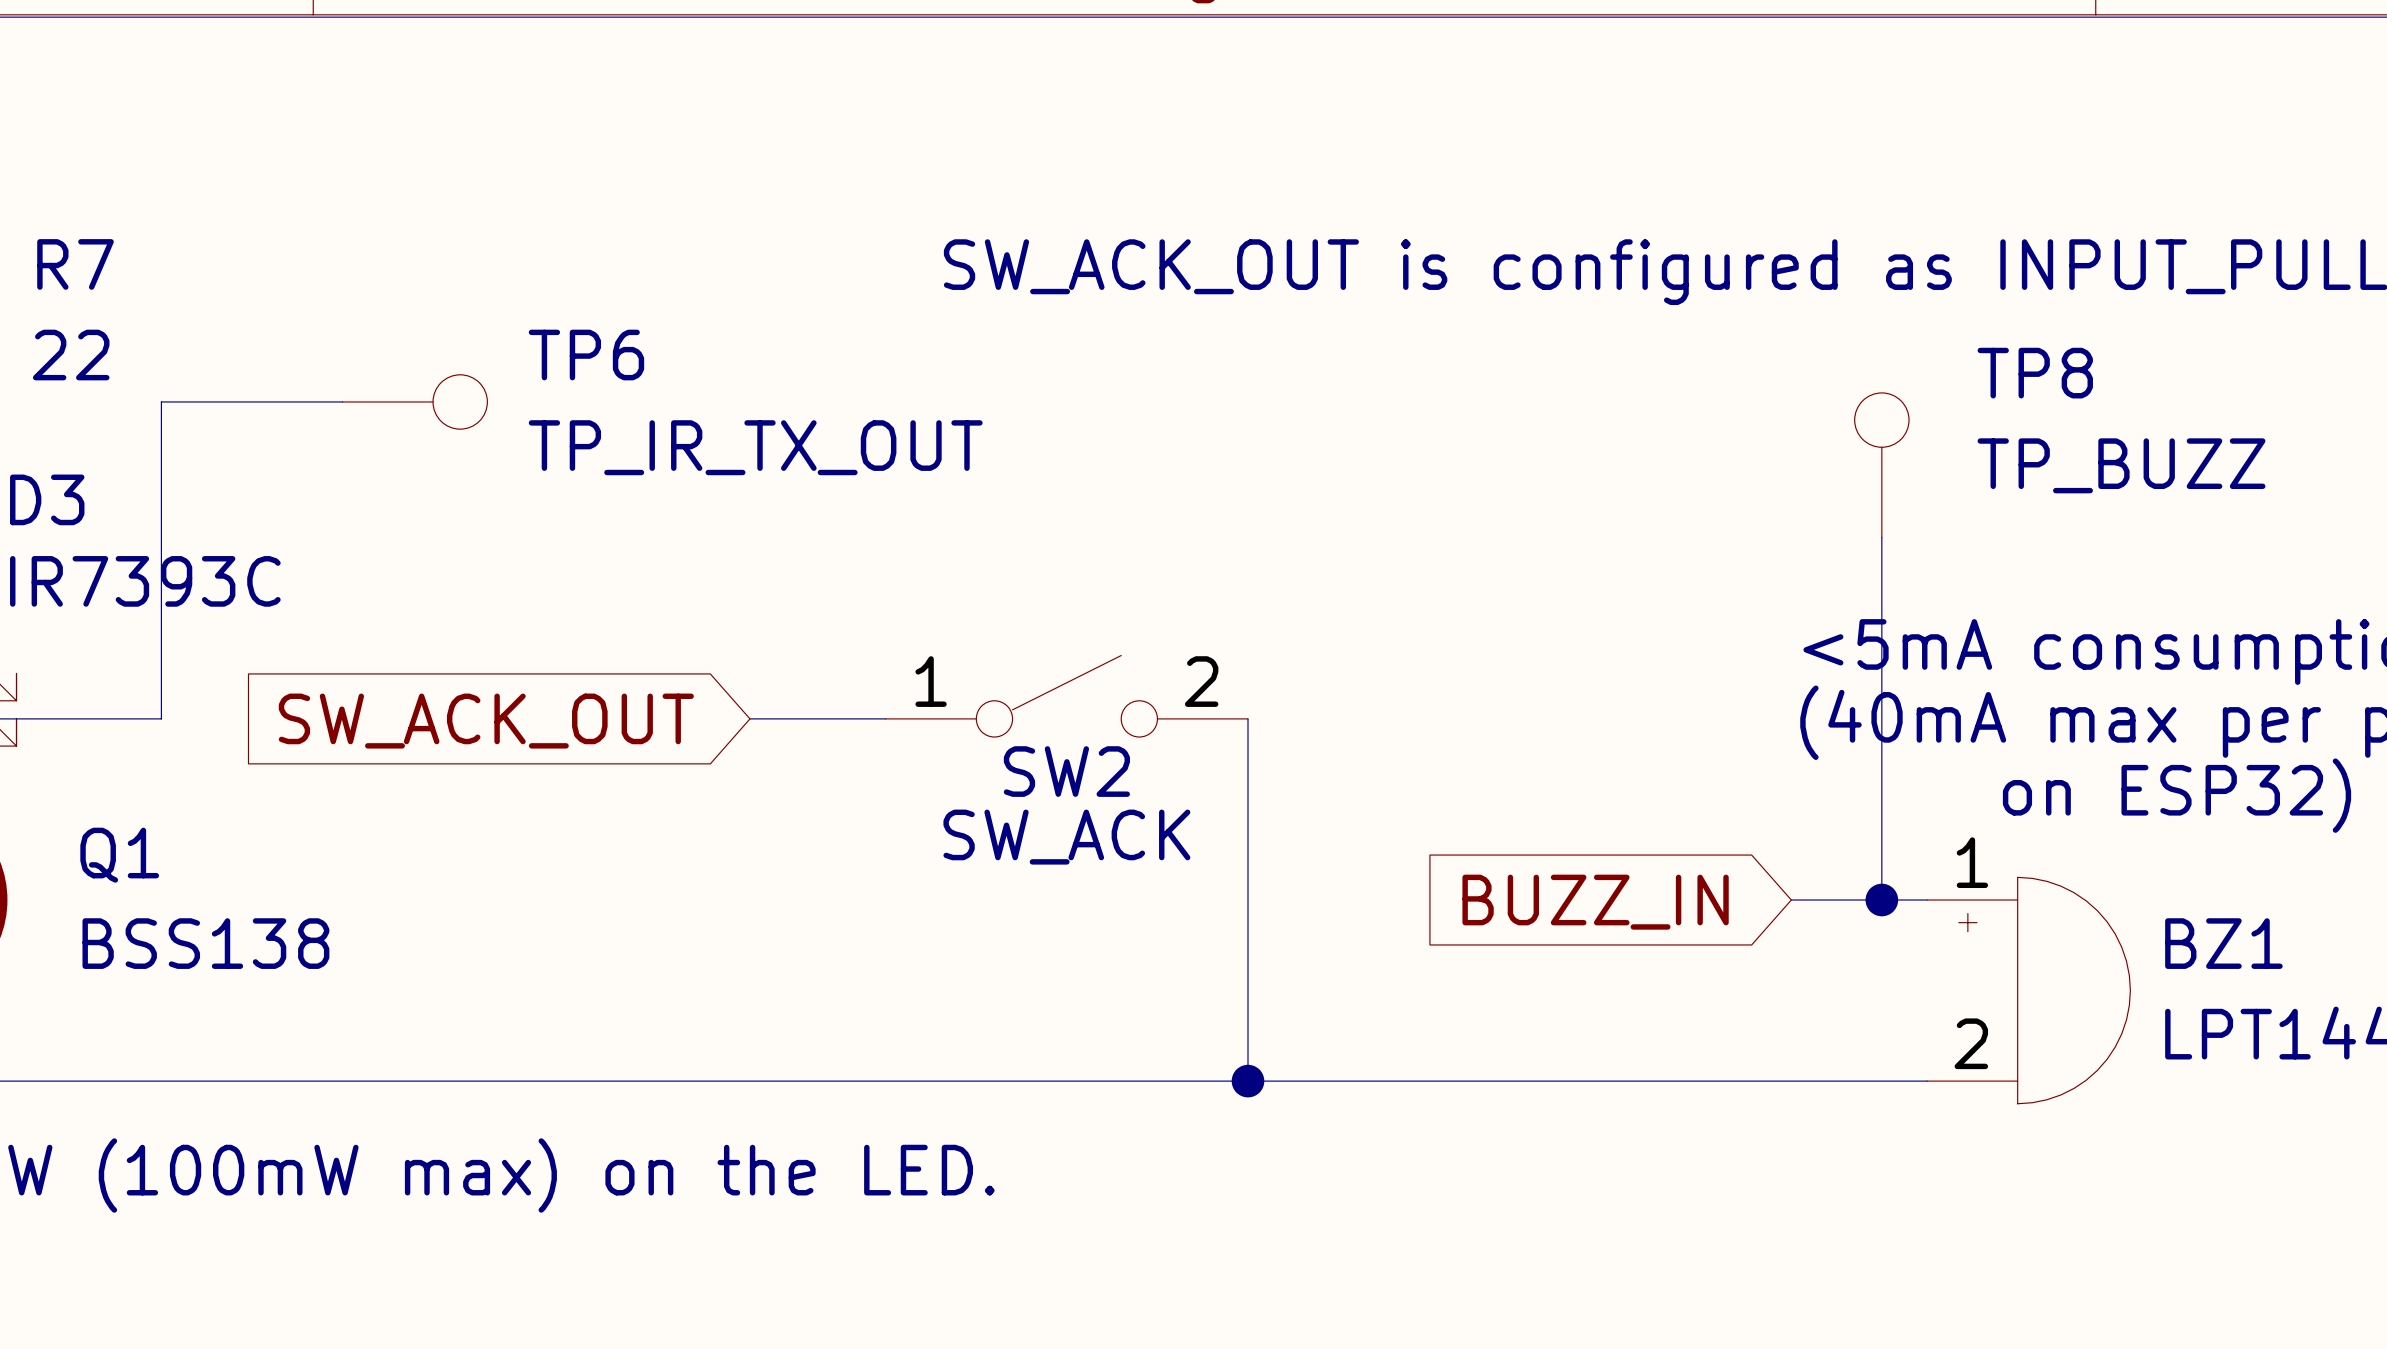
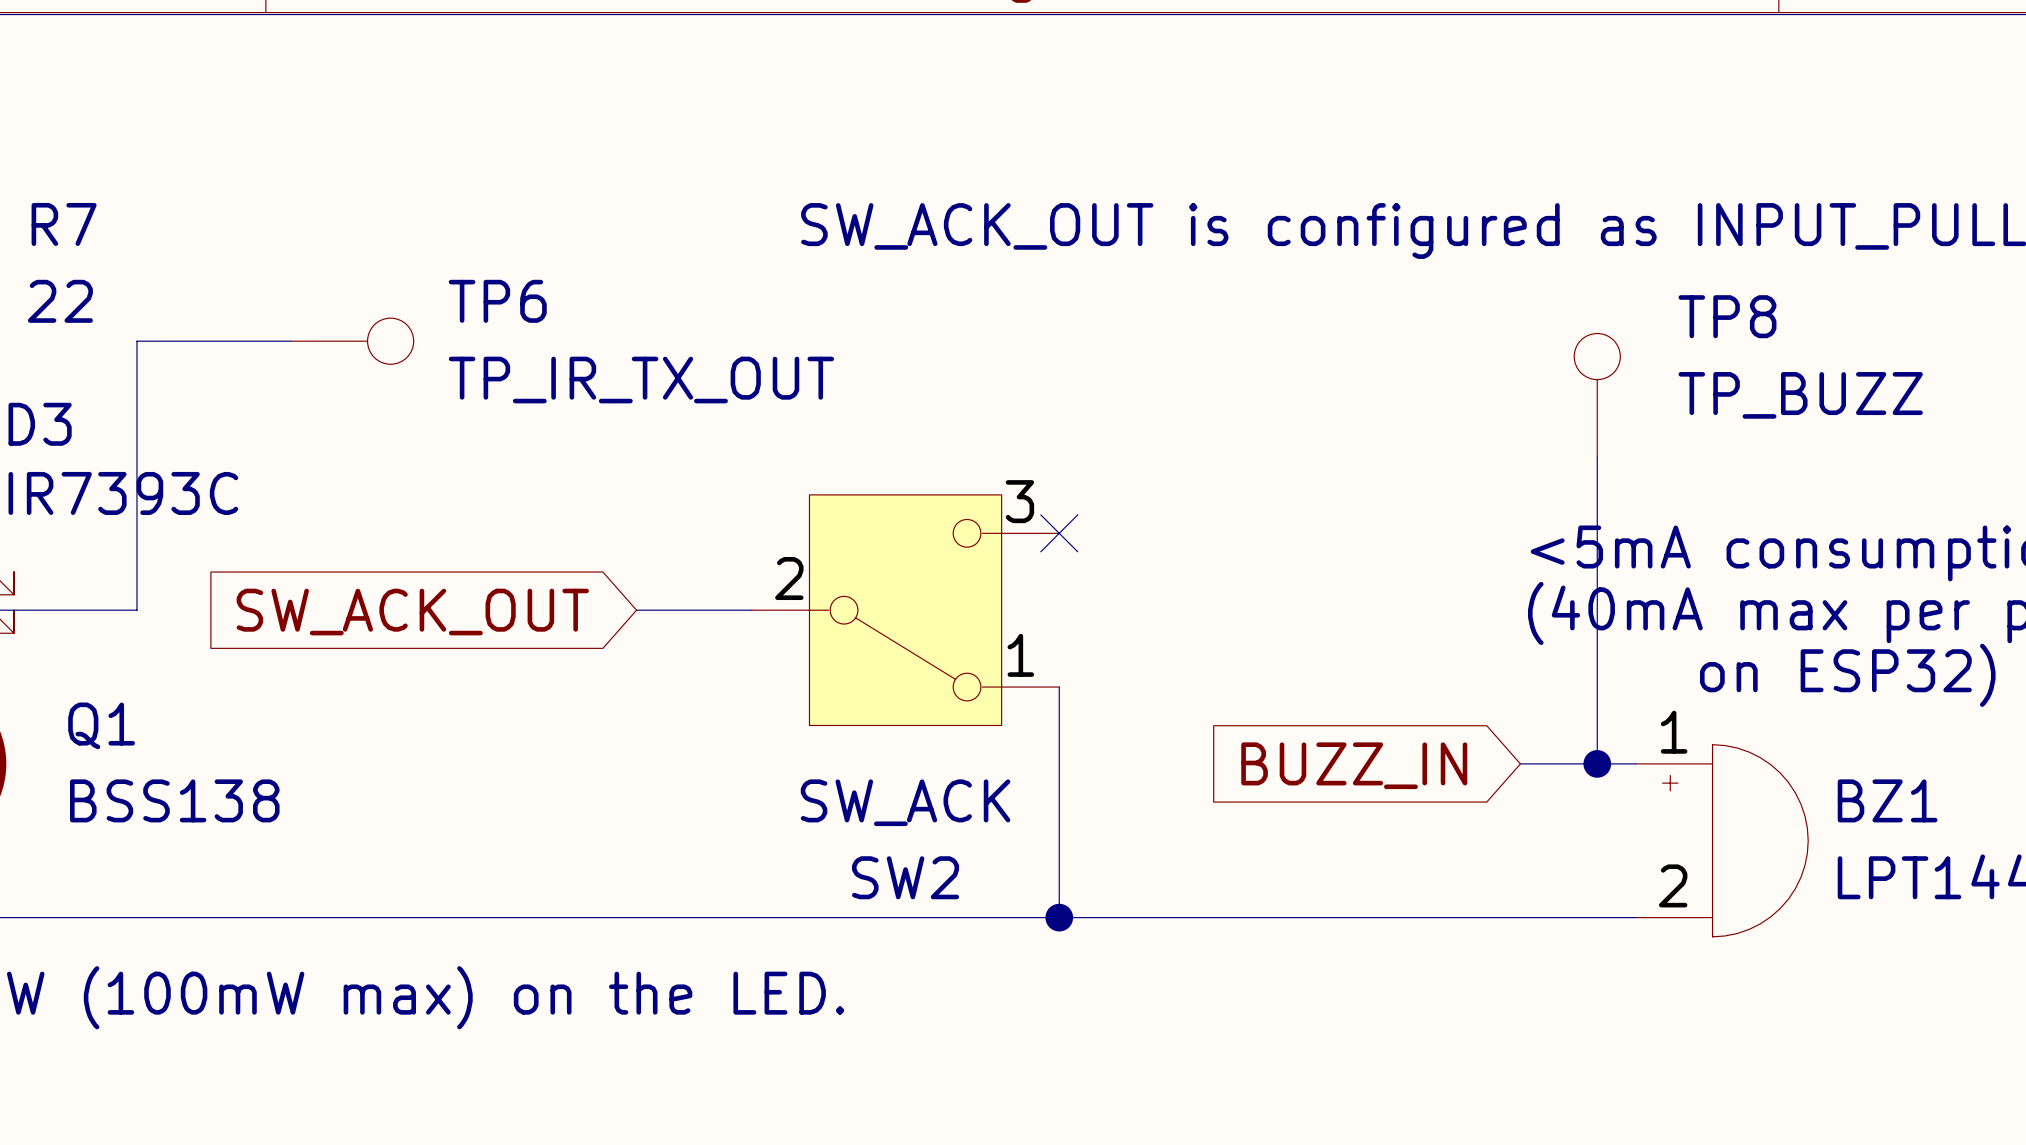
no-connect mark: none -> (1059, 533)
SW2 symbol: [885, 655, 1249, 738] -> [751, 494, 1060, 726]
wire: (1248, 718) (1248, 809) -> none
SW2 name position: SW2 (1066, 771) -> SW2 (905, 877)
SW2 value position: SW_ACK (1066, 837) -> SW_ACK (905, 802)

